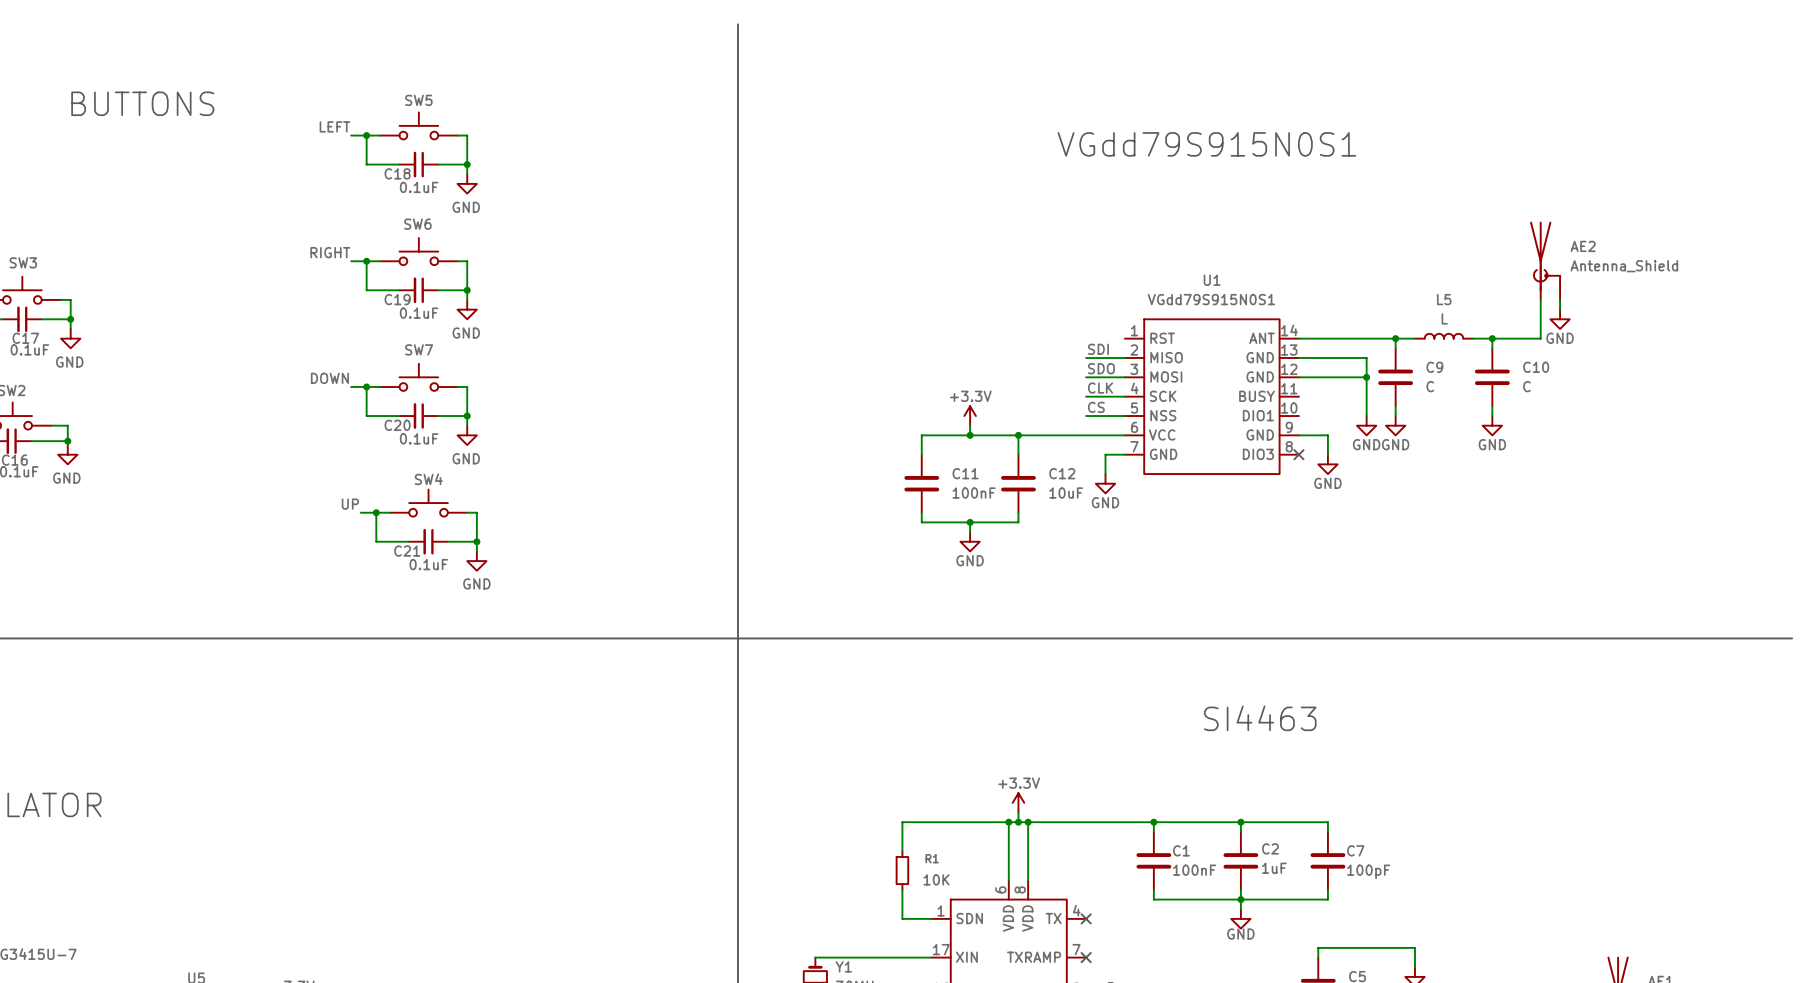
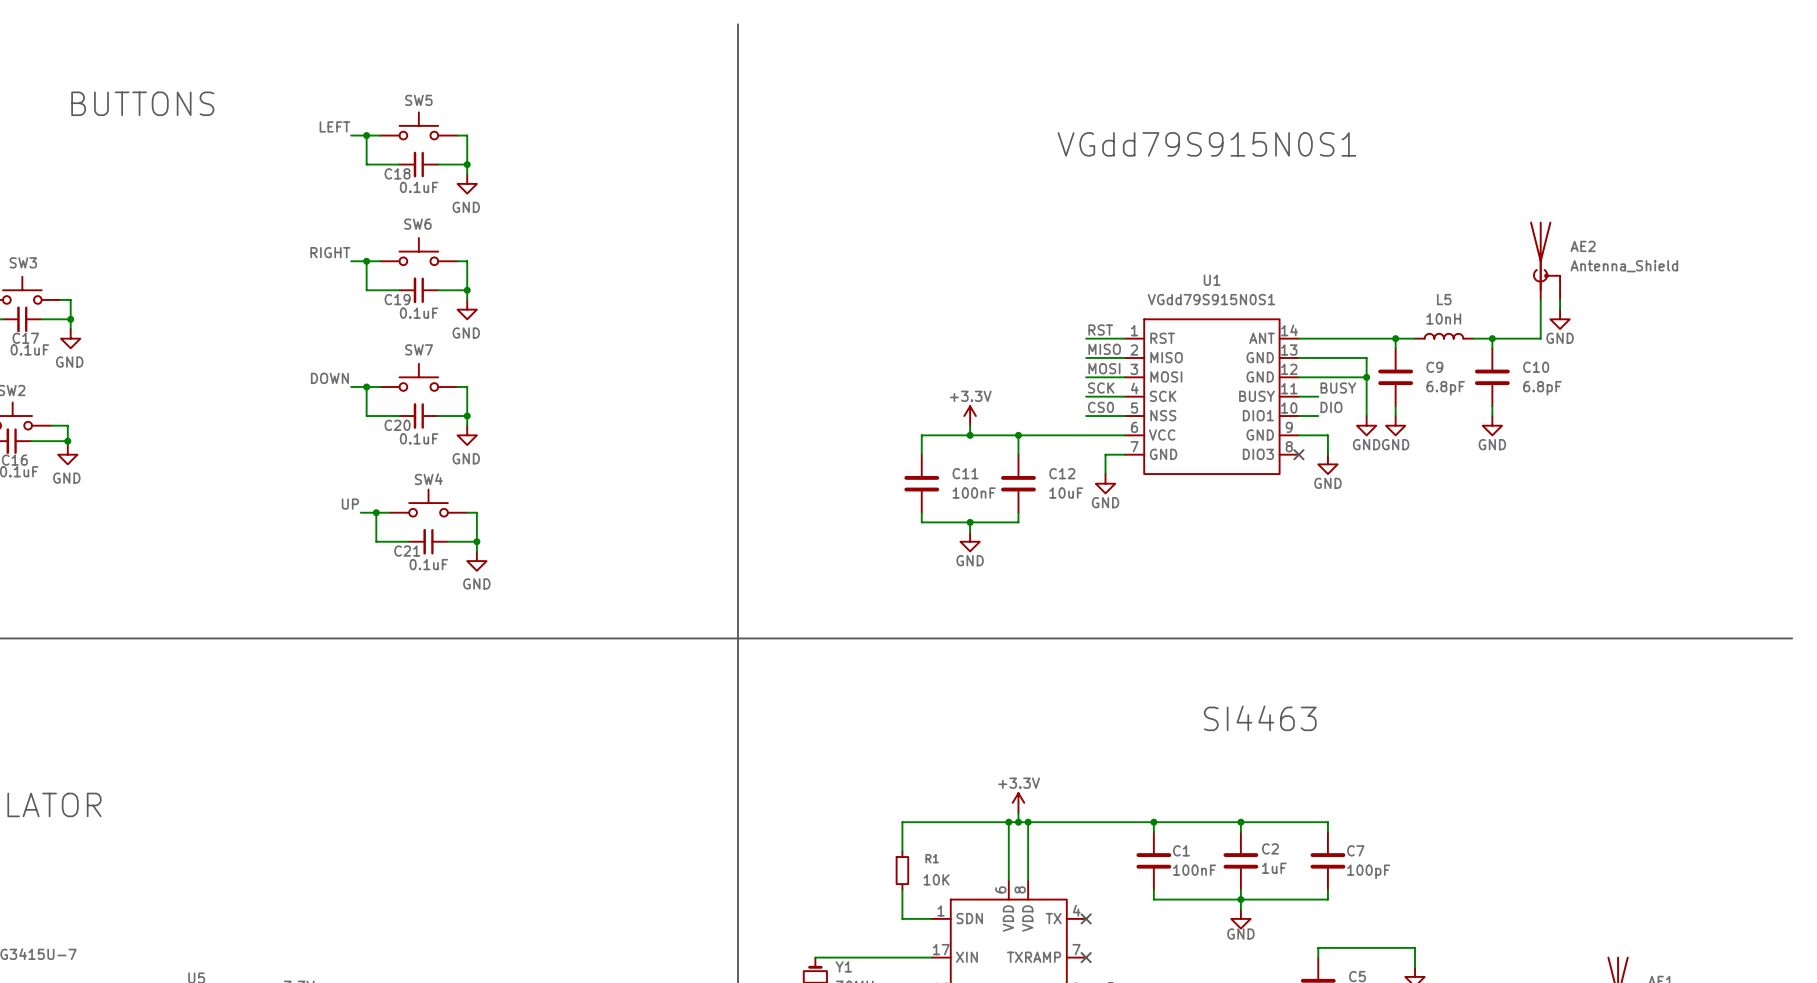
L5 value: L (1444, 318) -> 10nH (1443, 318)
label: none -> RST (1100, 330)
wire: none -> (1086, 338) (1124, 338)
label: SDI (1098, 349) -> MISO (1104, 349)
label: SDO (1101, 368) -> MOSI (1104, 368)
C9 value: C (1430, 386) -> 6.8pF (1445, 388)
C10 value: C (1526, 386) -> 6.8pF (1542, 388)
label: CLK (1100, 388) -> SCK (1101, 388)
label: none -> BUSY (1338, 388)
wire: none -> (1298, 396) (1318, 396)
label: CS (1096, 407) -> CS0 (1100, 407)
label: none -> DIO (1331, 407)
wire: none -> (1298, 416) (1318, 416)

